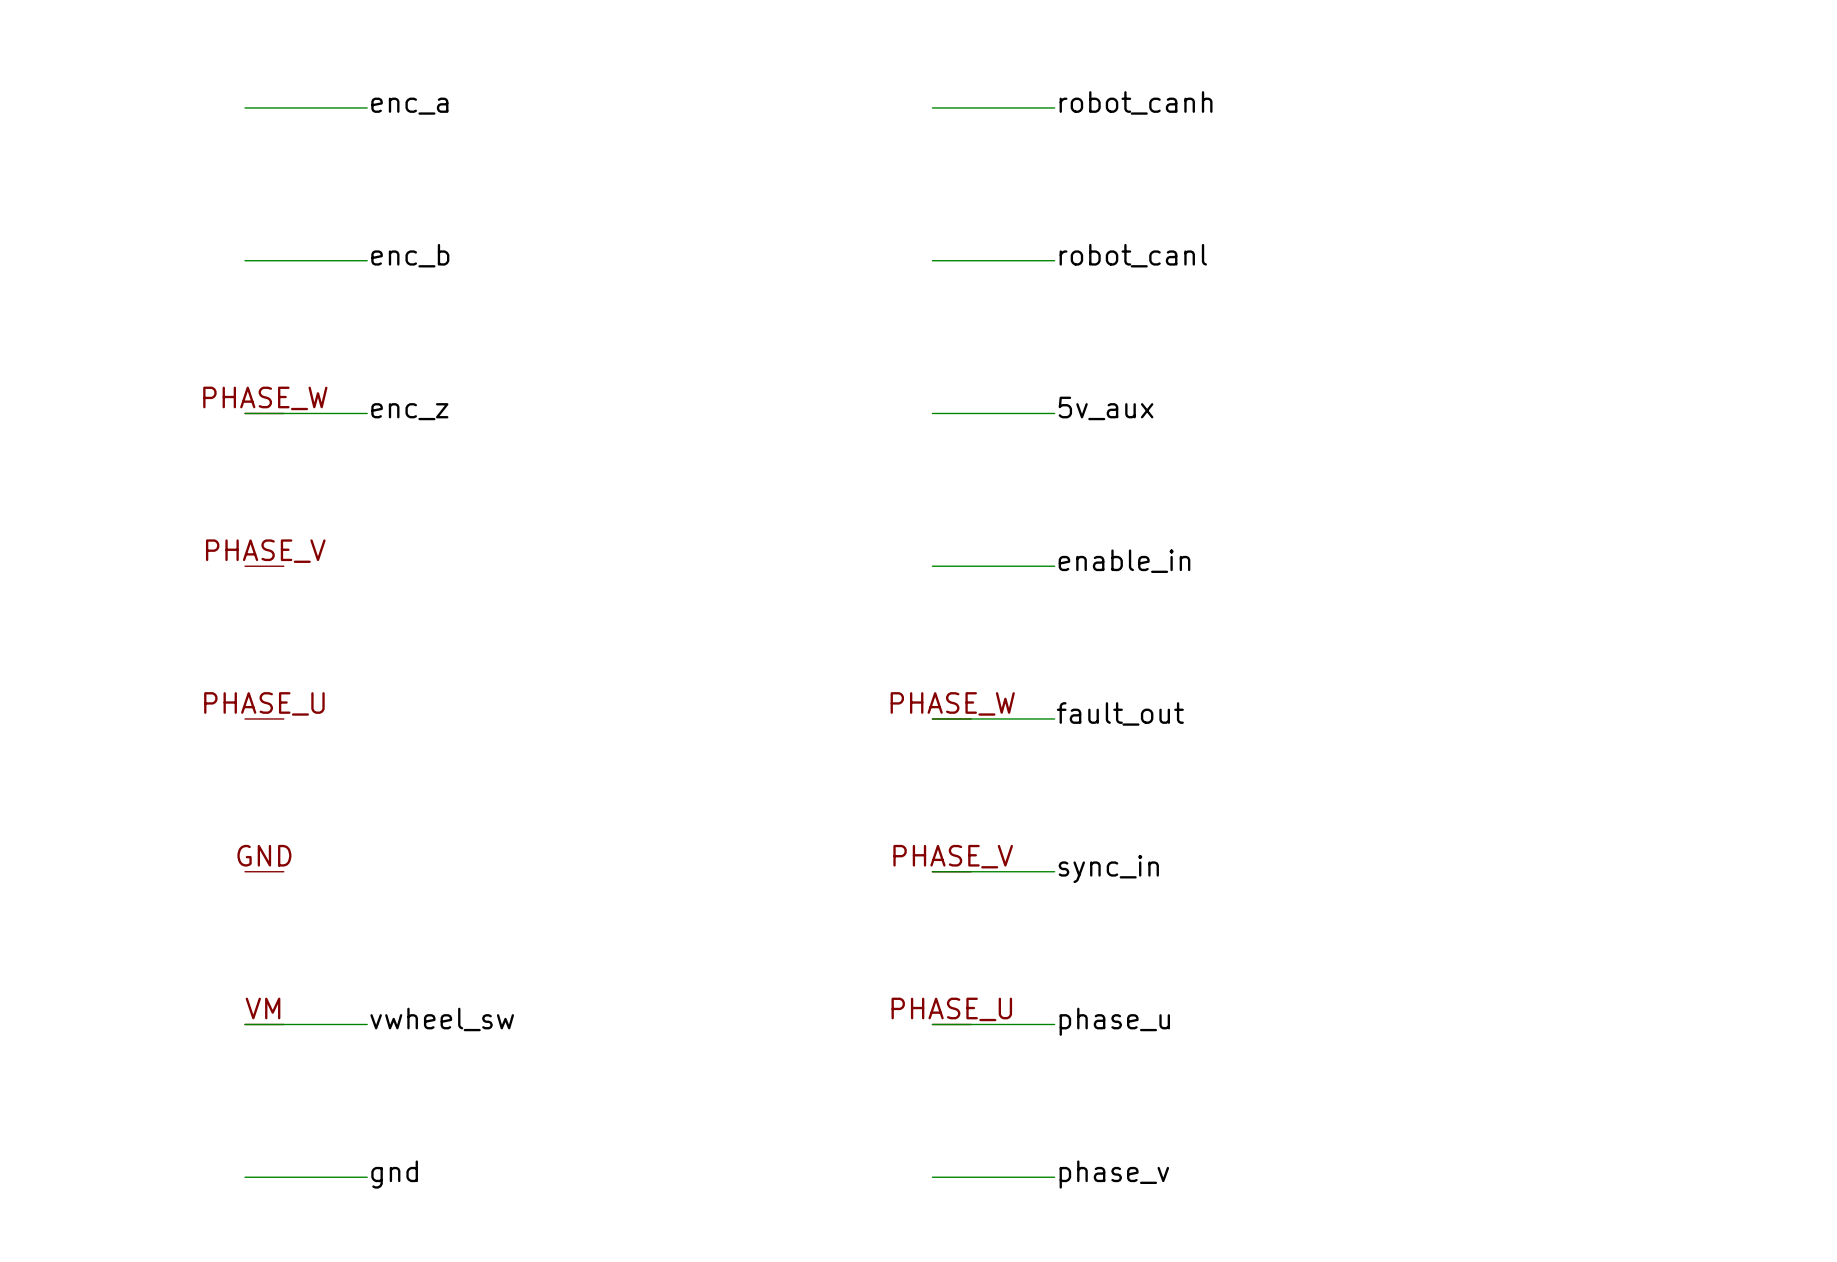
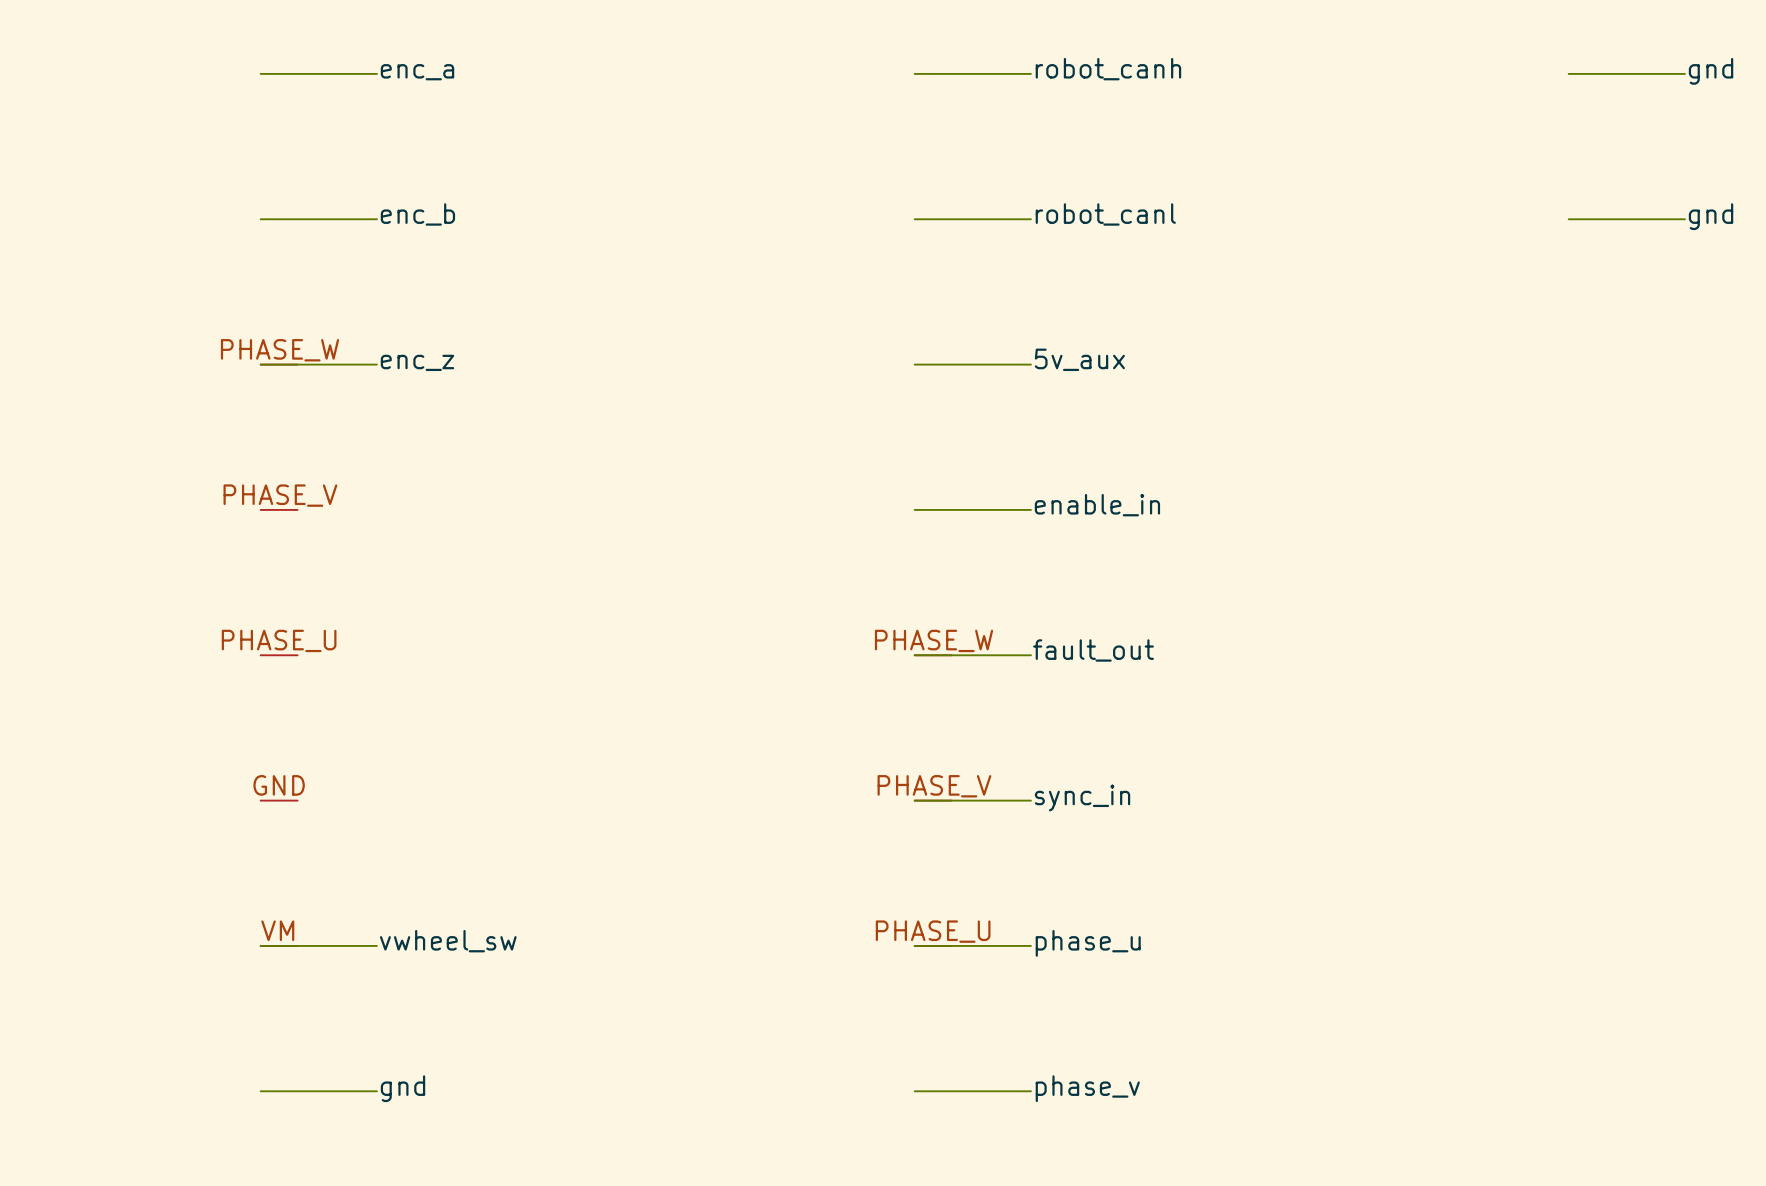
label: none -> gnd (1711, 71)
wire: none -> (1568, 73) (1684, 73)
label: none -> gnd (1711, 216)
wire: none -> (1568, 219) (1684, 219)

